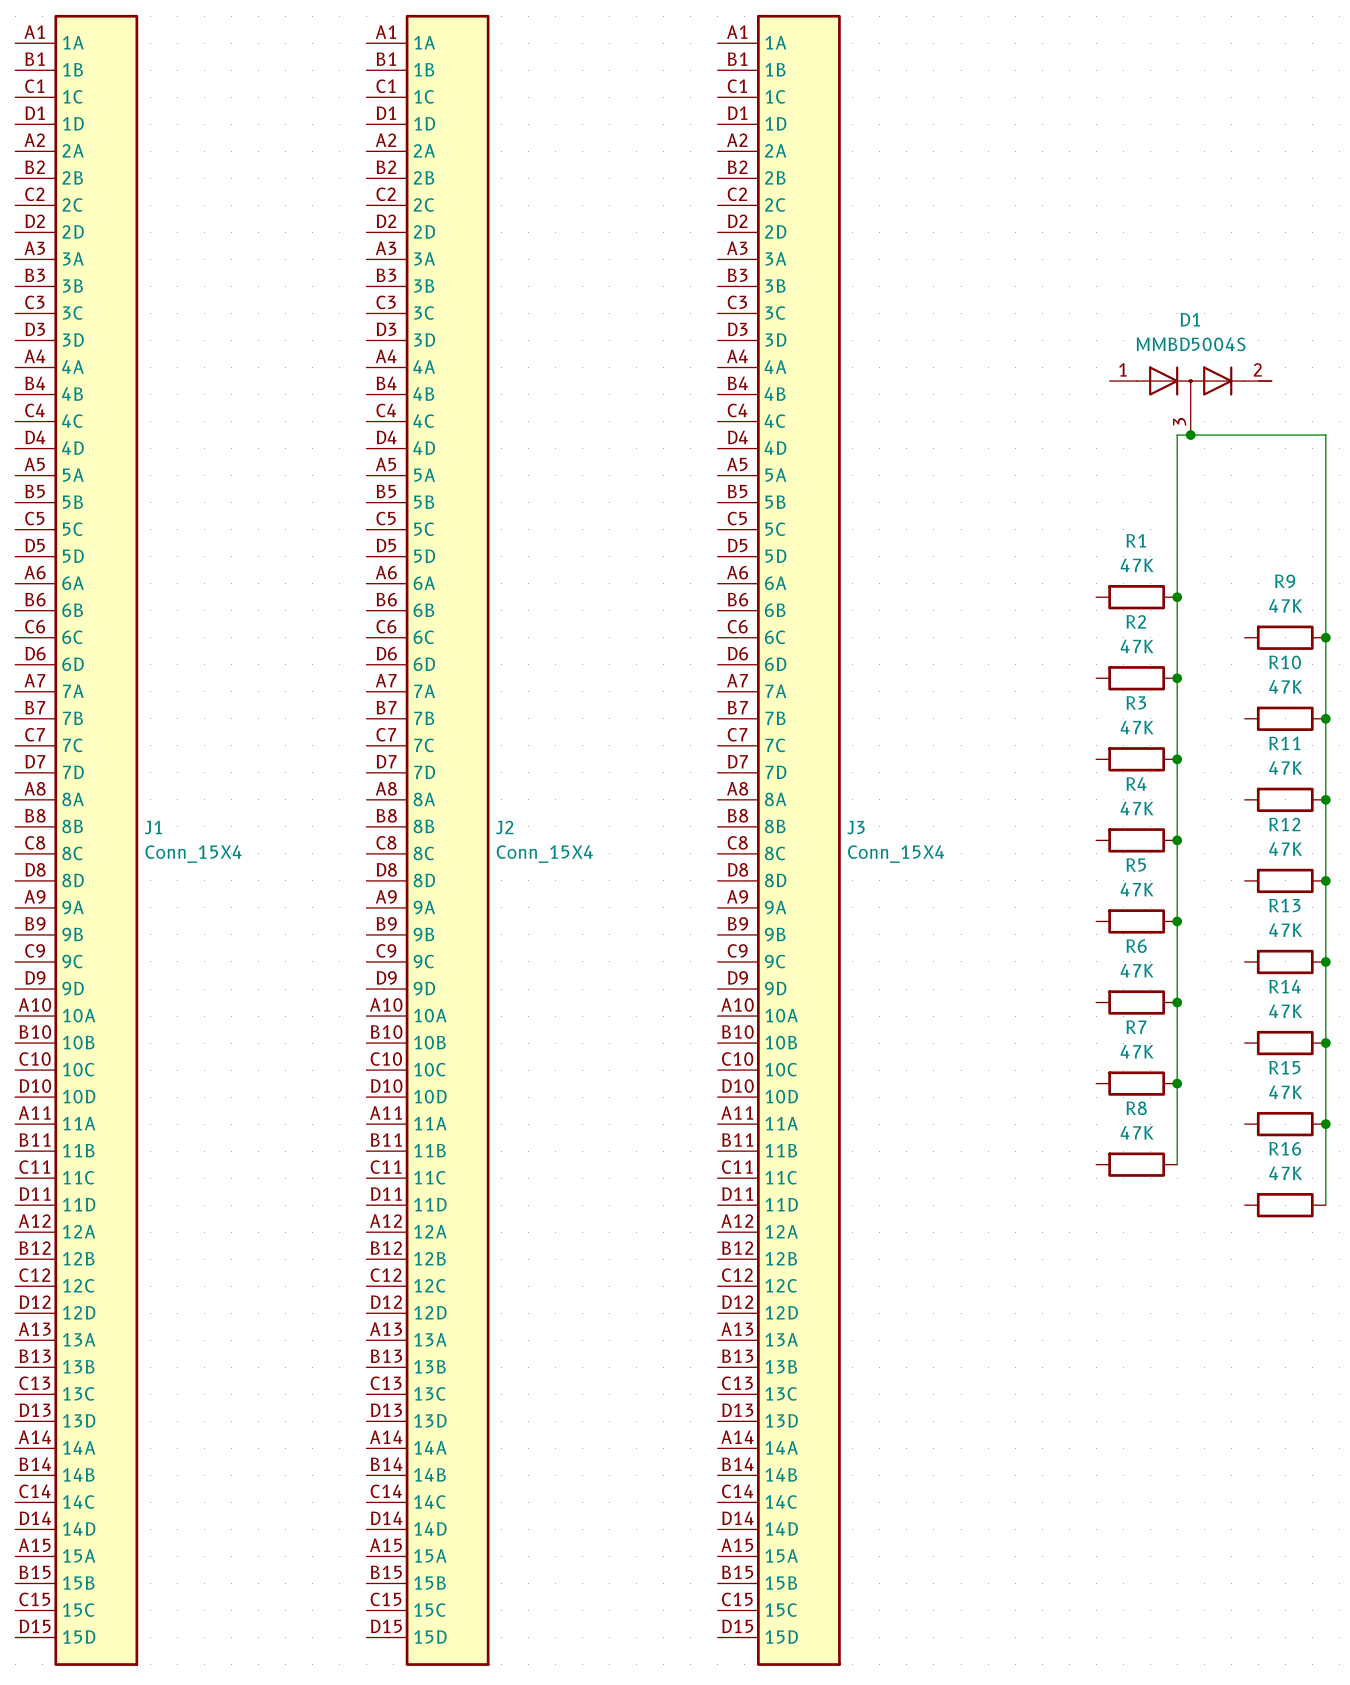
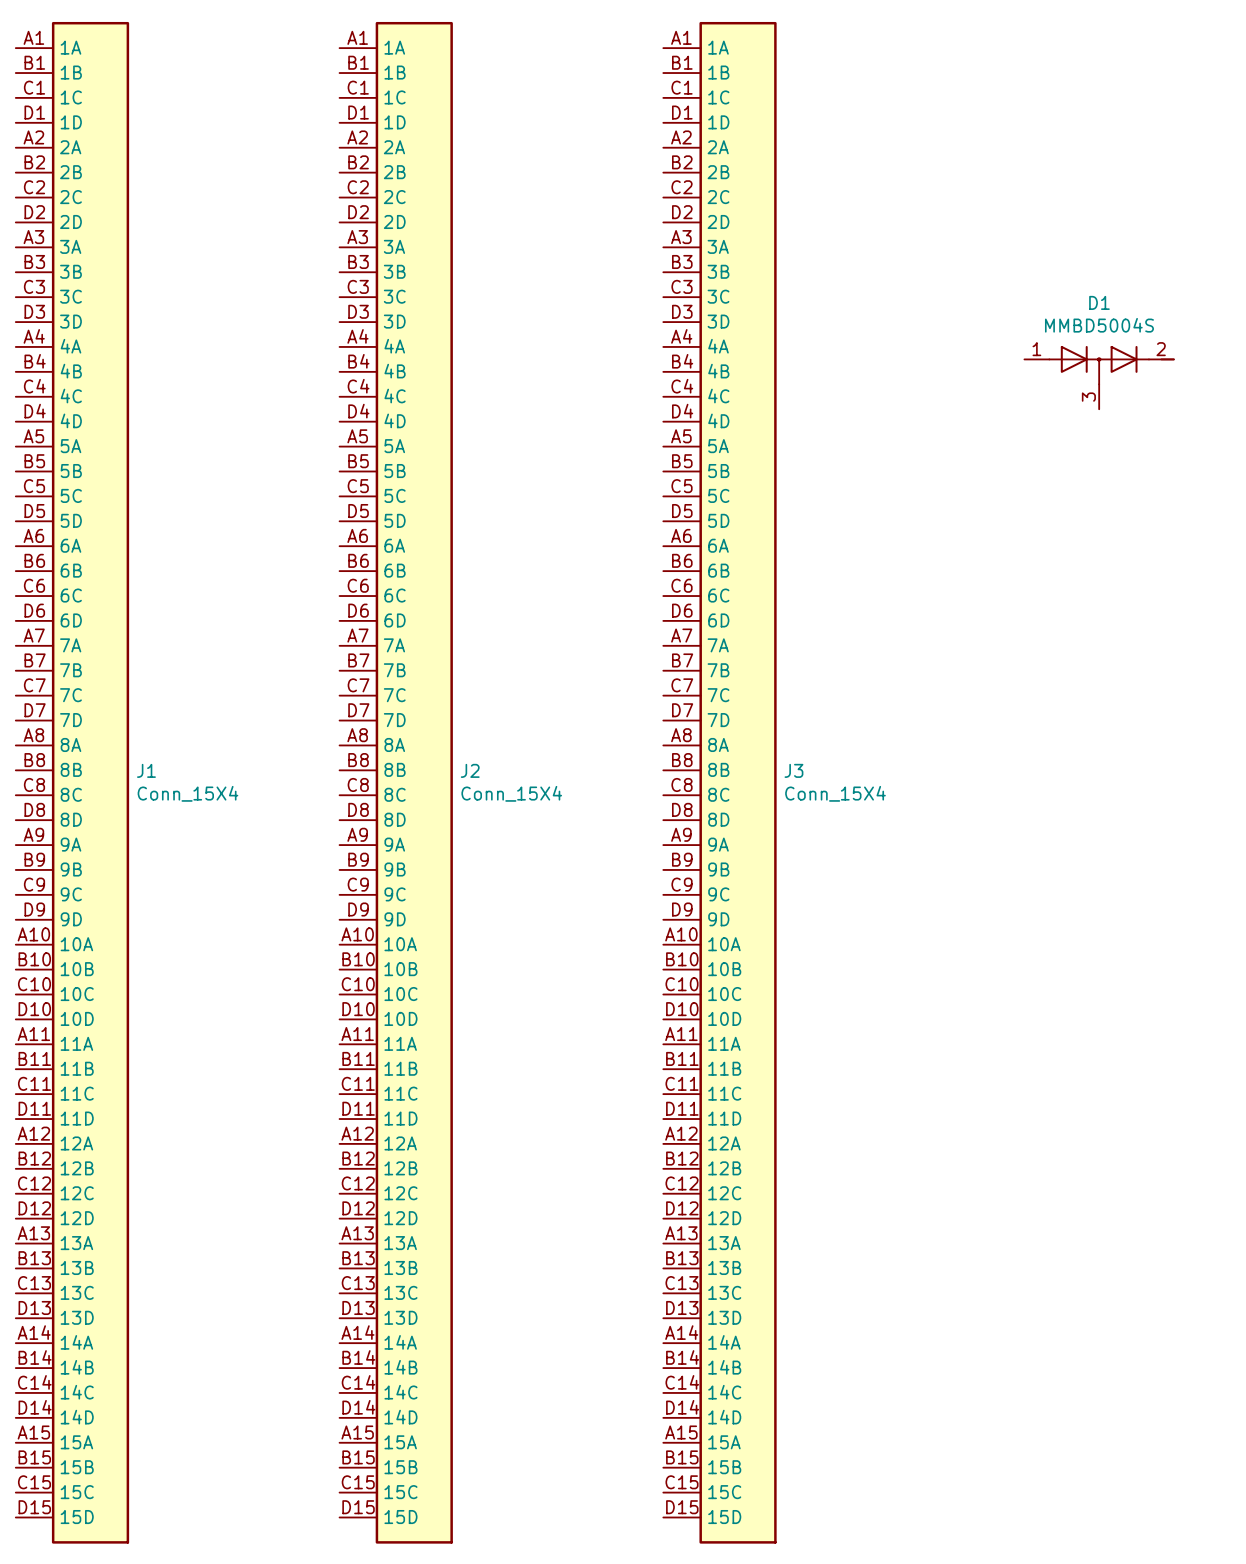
junction: (1190, 435) -> none
R1: 47K (1136, 597) -> none
junction: (1177, 597) -> none
R9: 47K (1285, 637) -> none
junction: (1325, 637) -> none
R2: 47K (1136, 678) -> none
junction: (1177, 678) -> none
R10: 47K (1285, 718) -> none
junction: (1325, 718) -> none
R3: 47K (1136, 759) -> none
junction: (1177, 759) -> none
R11: 47K (1285, 799) -> none
junction: (1325, 799) -> none
R4: 47K (1136, 840) -> none
junction: (1177, 840) -> none
R12: 47K (1285, 880) -> none
junction: (1325, 880) -> none
R5: 47K (1136, 921) -> none
junction: (1177, 921) -> none
R13: 47K (1285, 961) -> none
junction: (1325, 961) -> none
R6: 47K (1136, 1002) -> none
junction: (1177, 1002) -> none
R14: 47K (1285, 1043) -> none
junction: (1325, 1043) -> none
R7: 47K (1136, 1083) -> none
junction: (1177, 1083) -> none
R15: 47K (1285, 1124) -> none
junction: (1325, 1124) -> none
R8: 47K (1136, 1164) -> none
wire: (1177, 1164) (1177, 435) (1325, 435) (1325, 1205) -> none
R16: 47K (1285, 1205) -> none

